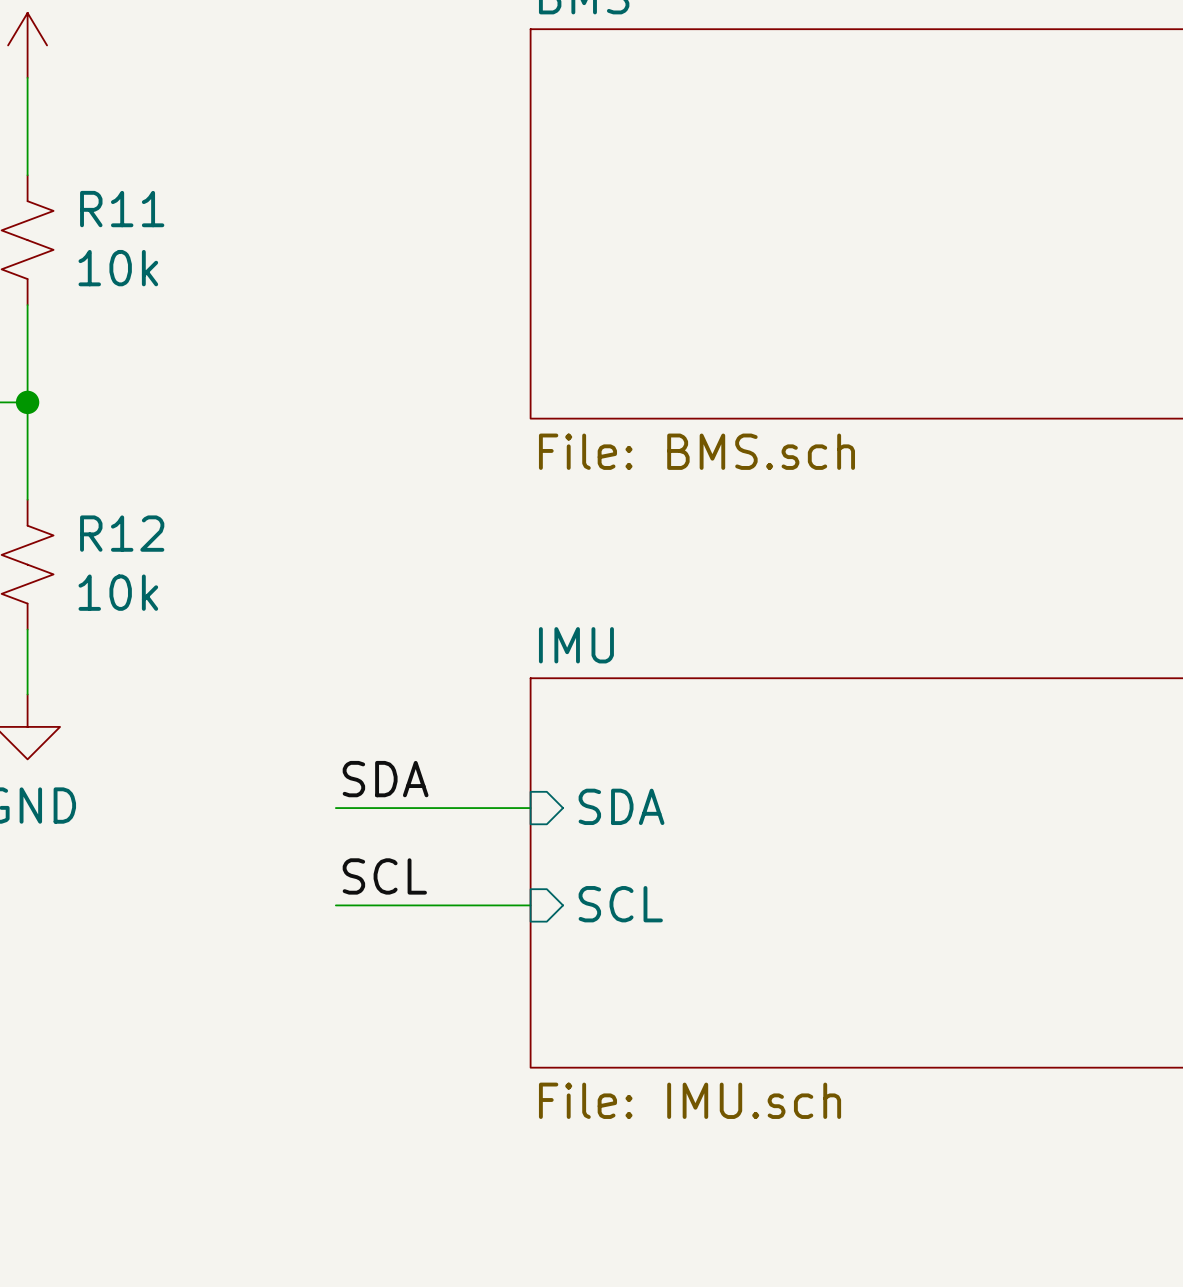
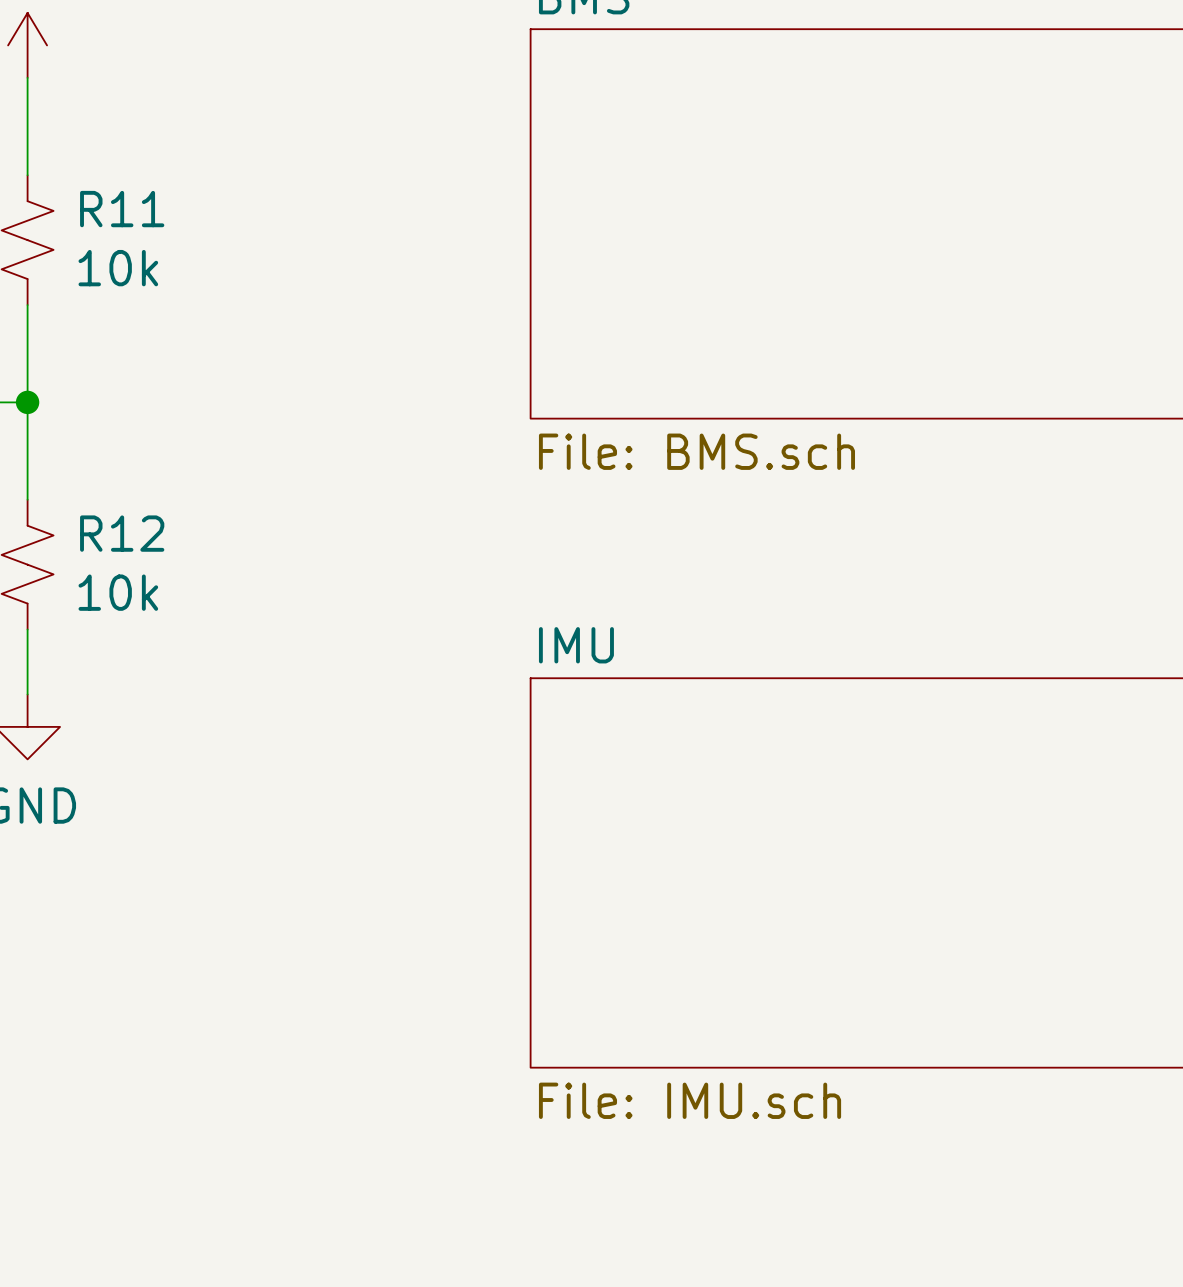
label: SDA (385, 779) -> none
sheet pin: SDA (621, 806) -> none
wire: (335, 808) (530, 808) -> none
label: SCL (384, 876) -> none
sheet pin: SCL (620, 904) -> none
wire: (335, 905) (530, 905) -> none

